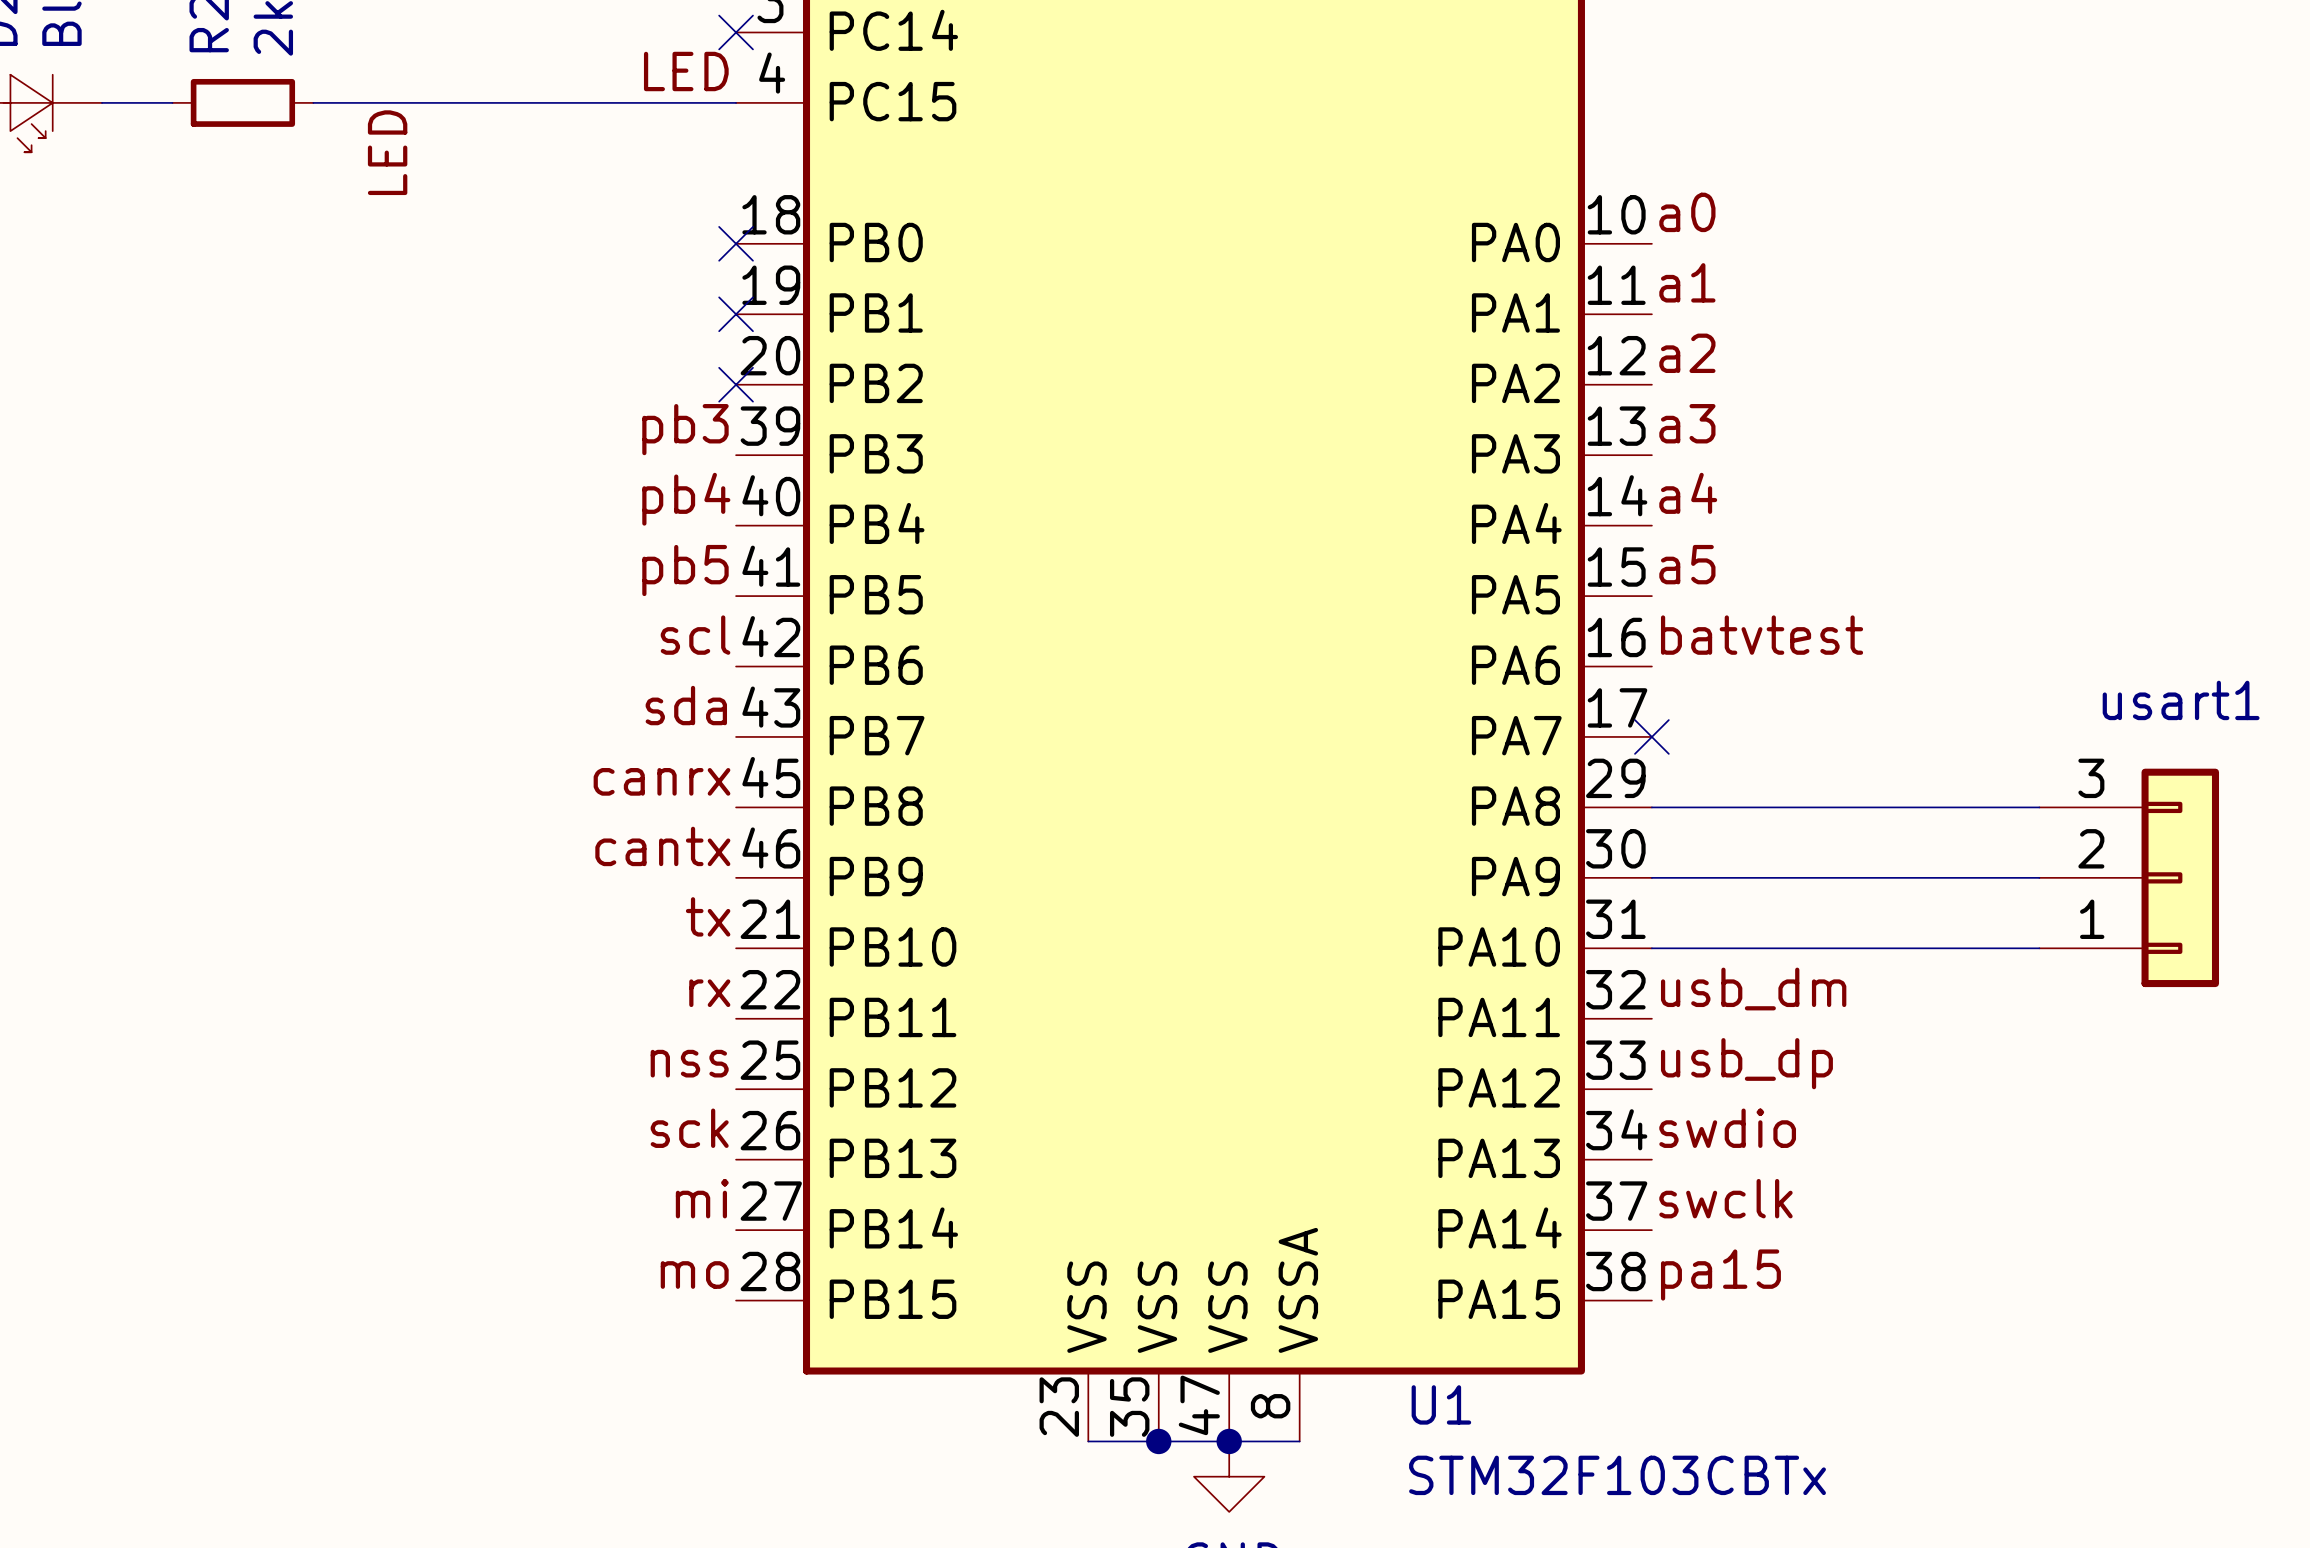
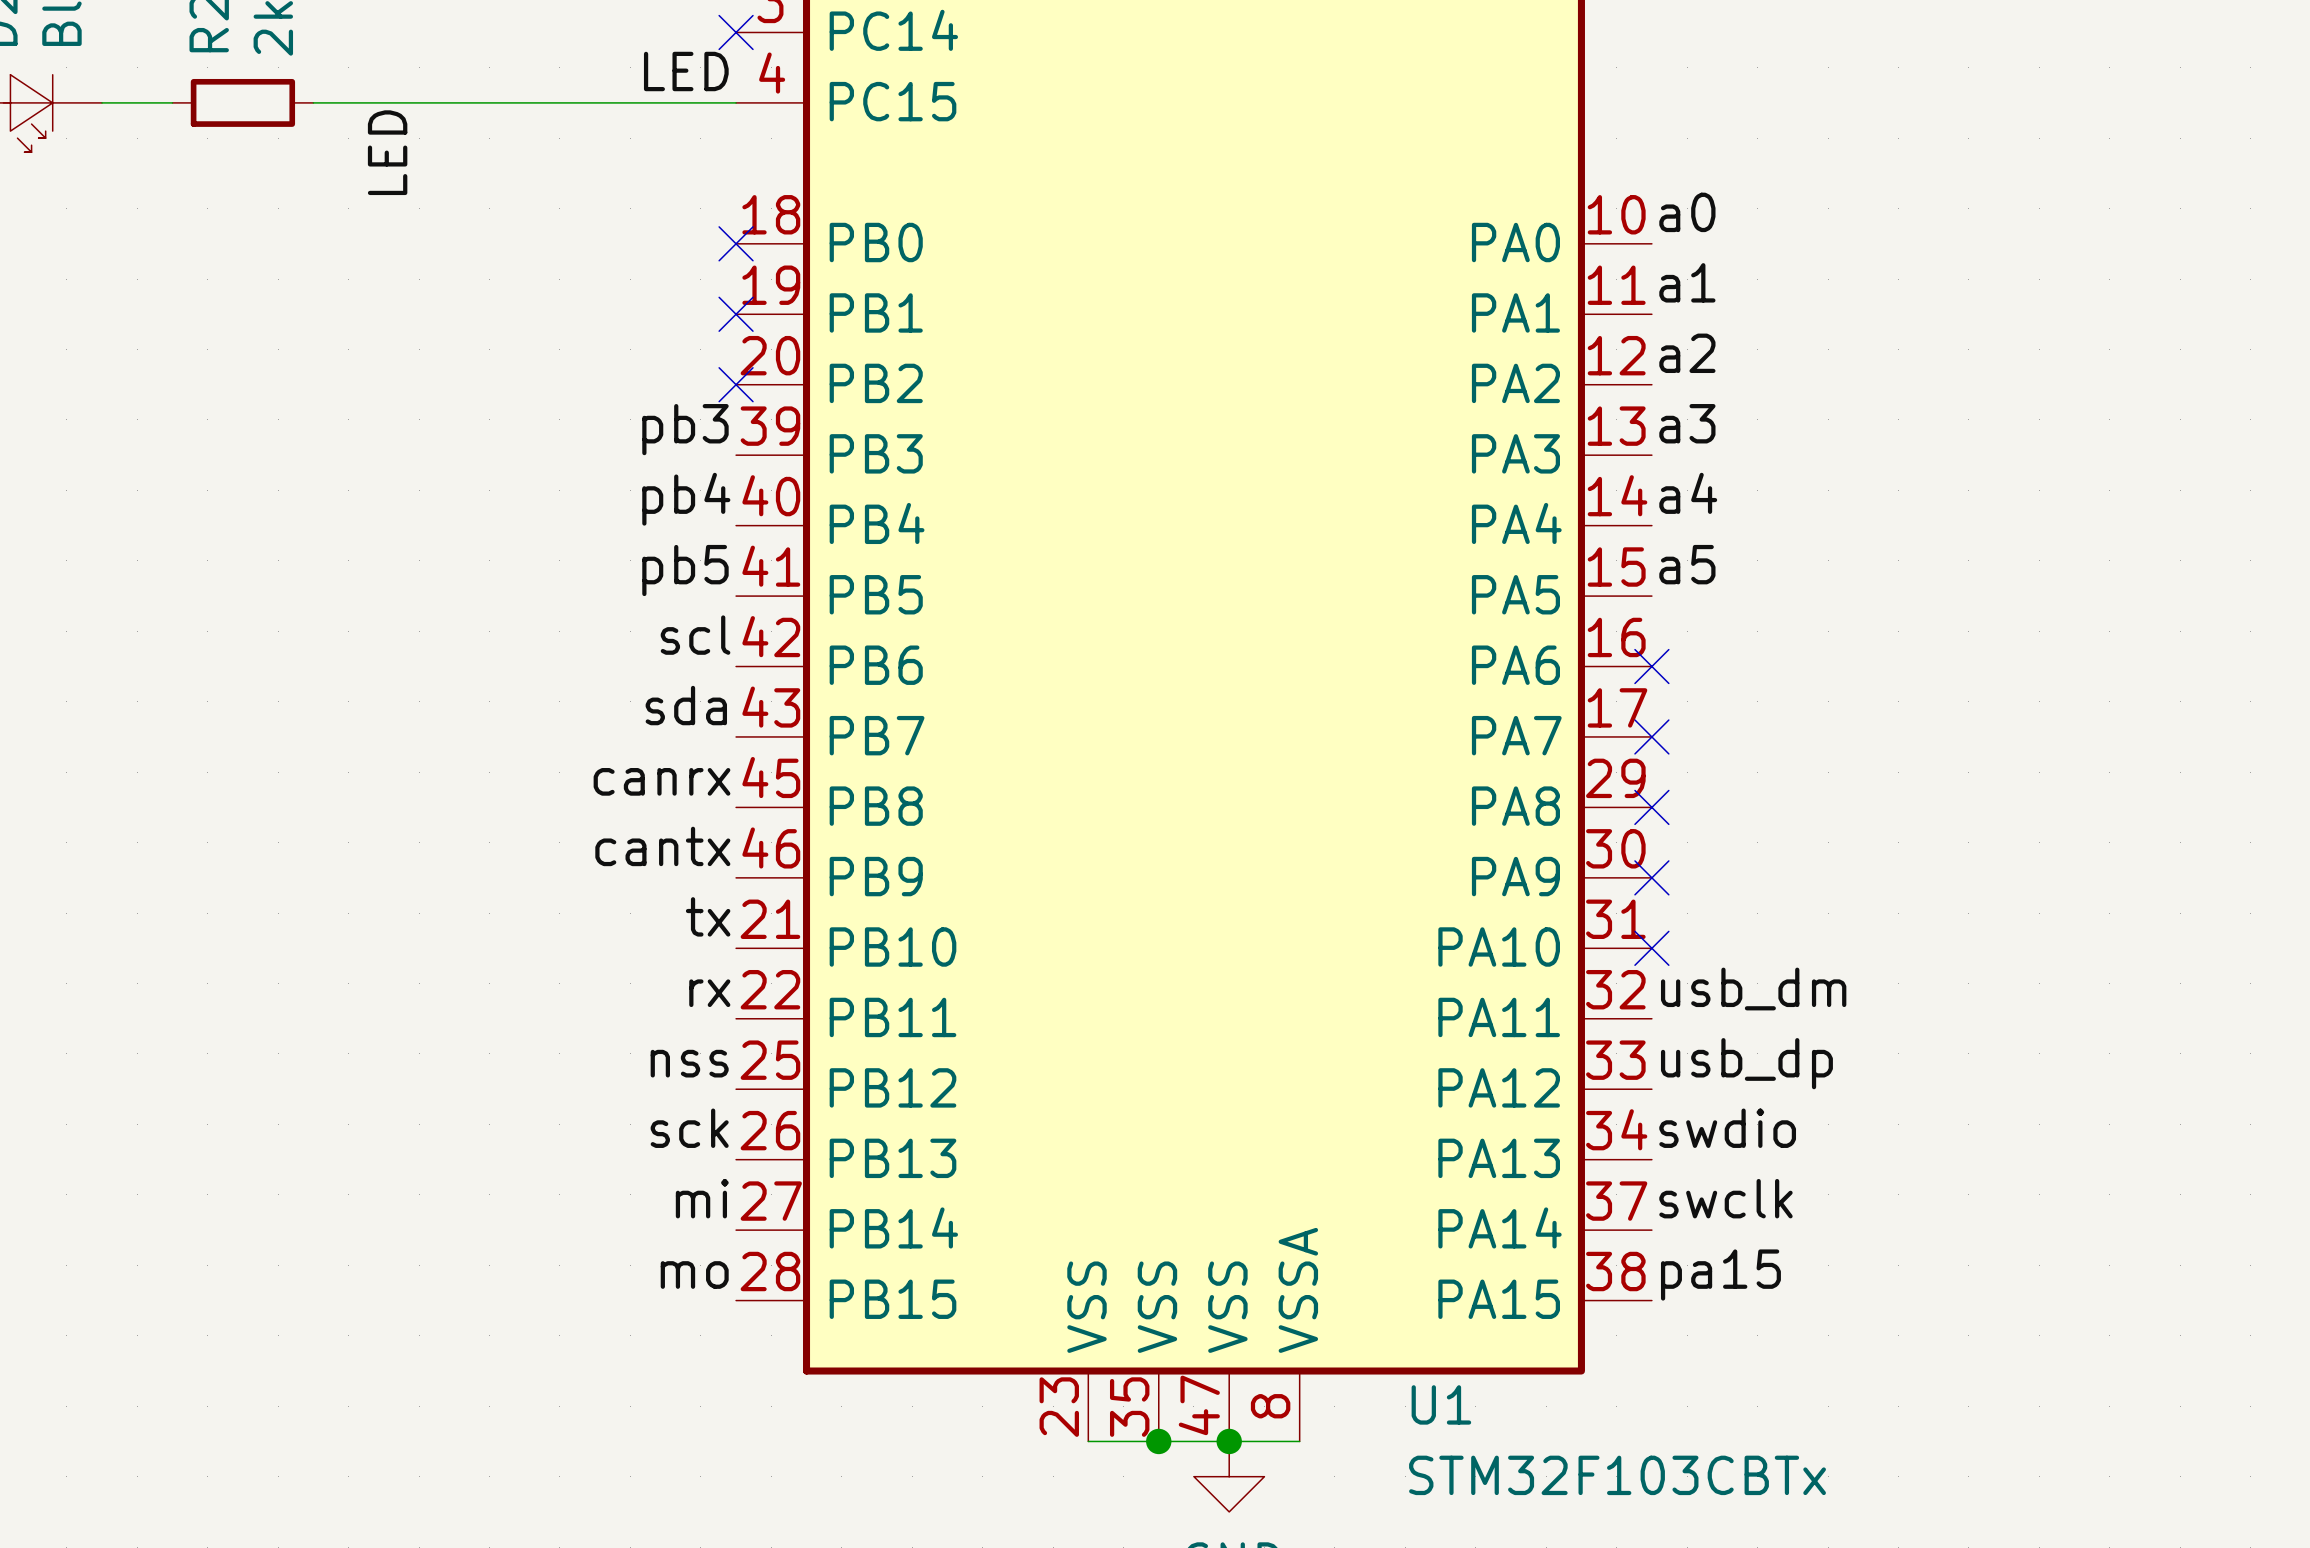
label: batvtest (1762, 635) -> none
no-connect mark: none -> (1651, 666)
wire: (1651, 807) (2039, 807) -> none
no-connect mark: none -> (1651, 807)
wire: (1651, 877) (2039, 877) -> none
no-connect mark: none -> (1651, 877)
usart1: (2129, 877) -> none
wire: (1651, 948) (2039, 948) -> none
no-connect mark: none -> (1651, 948)

